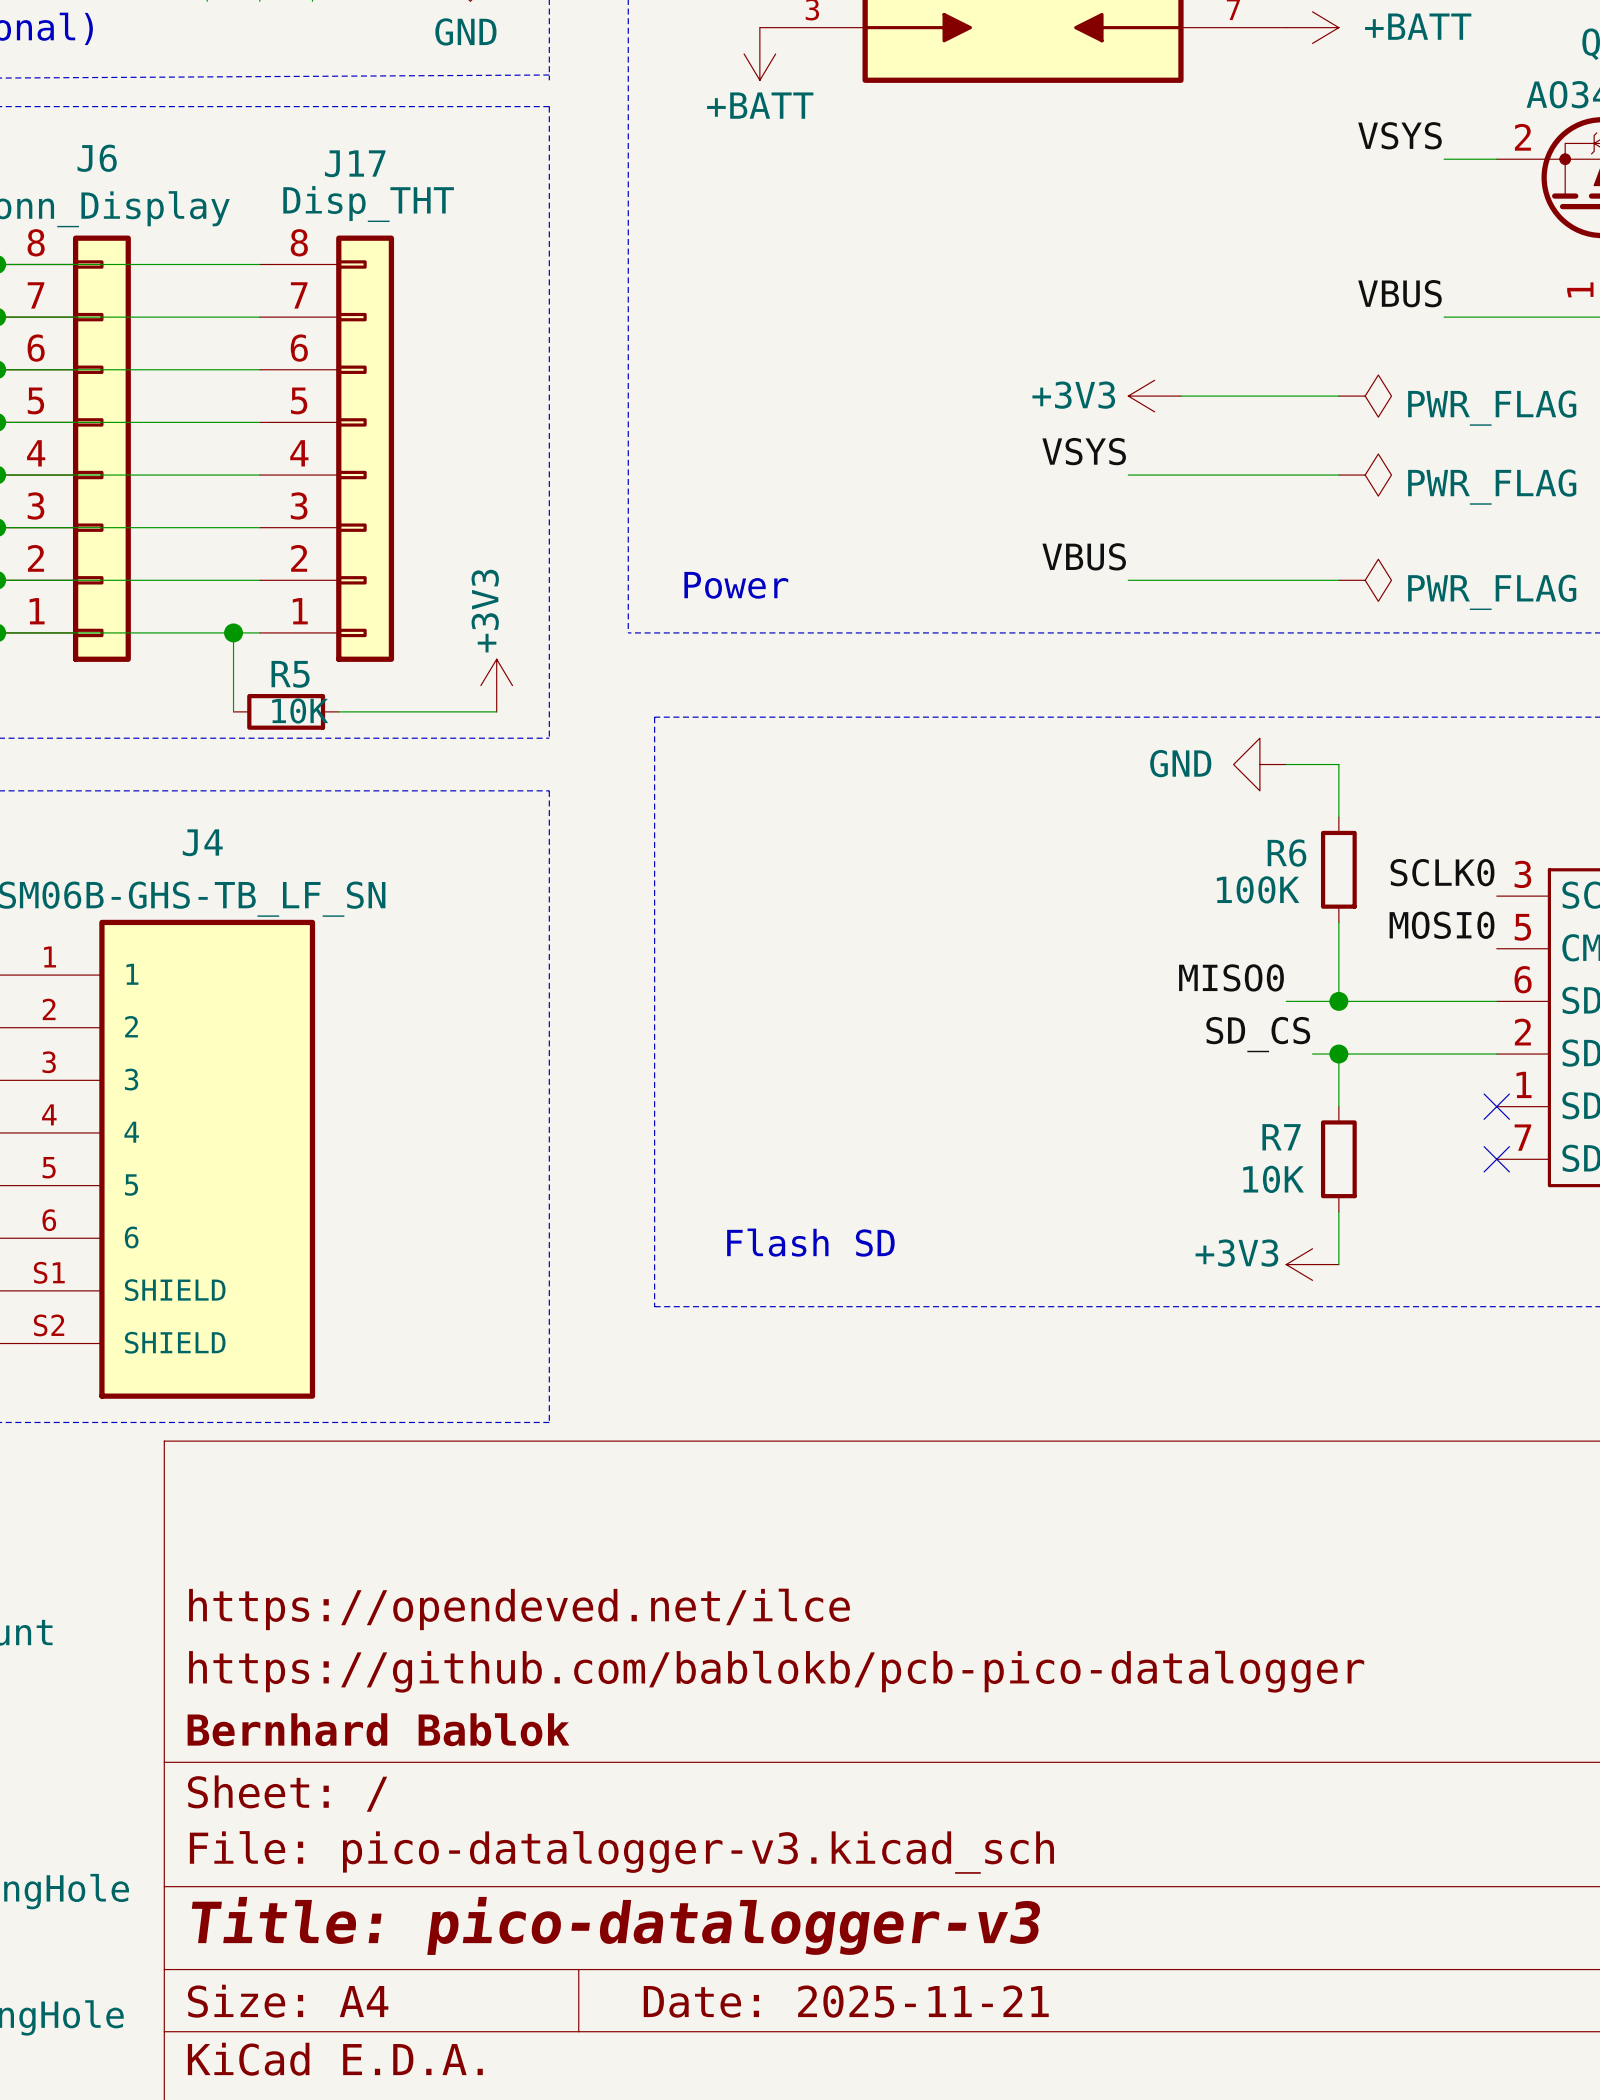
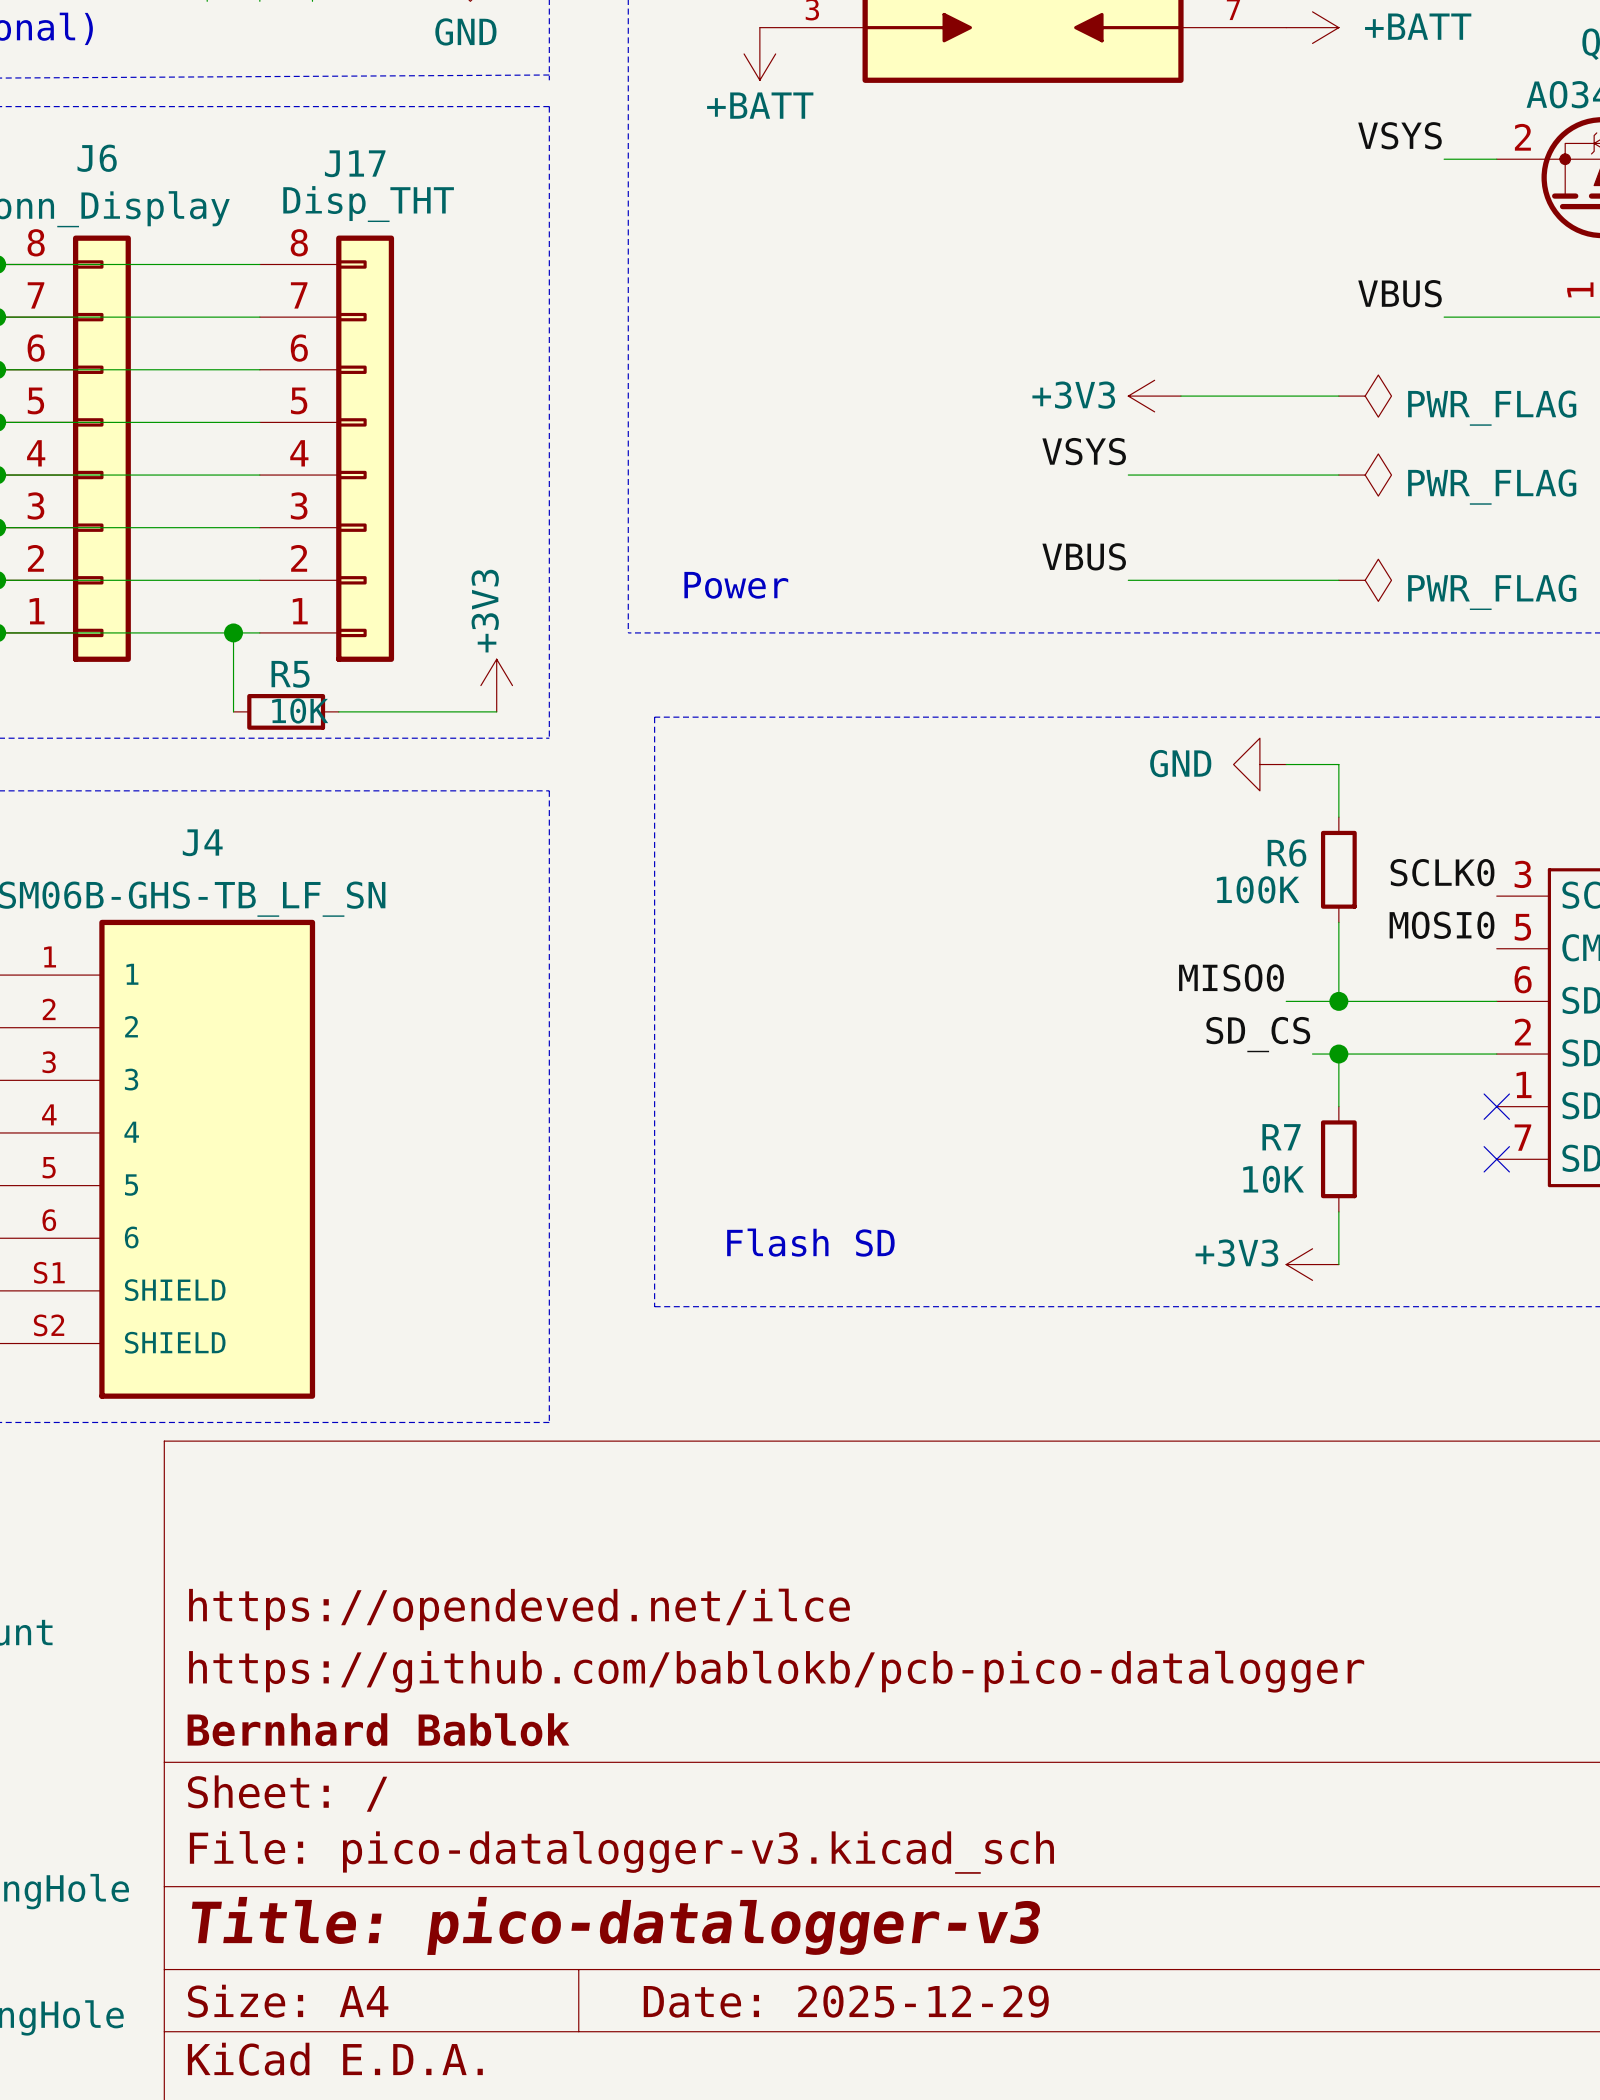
title block: Date: 2025-11-21 (846, 2001) -> Date: 2025-12-29 (846, 2001)

